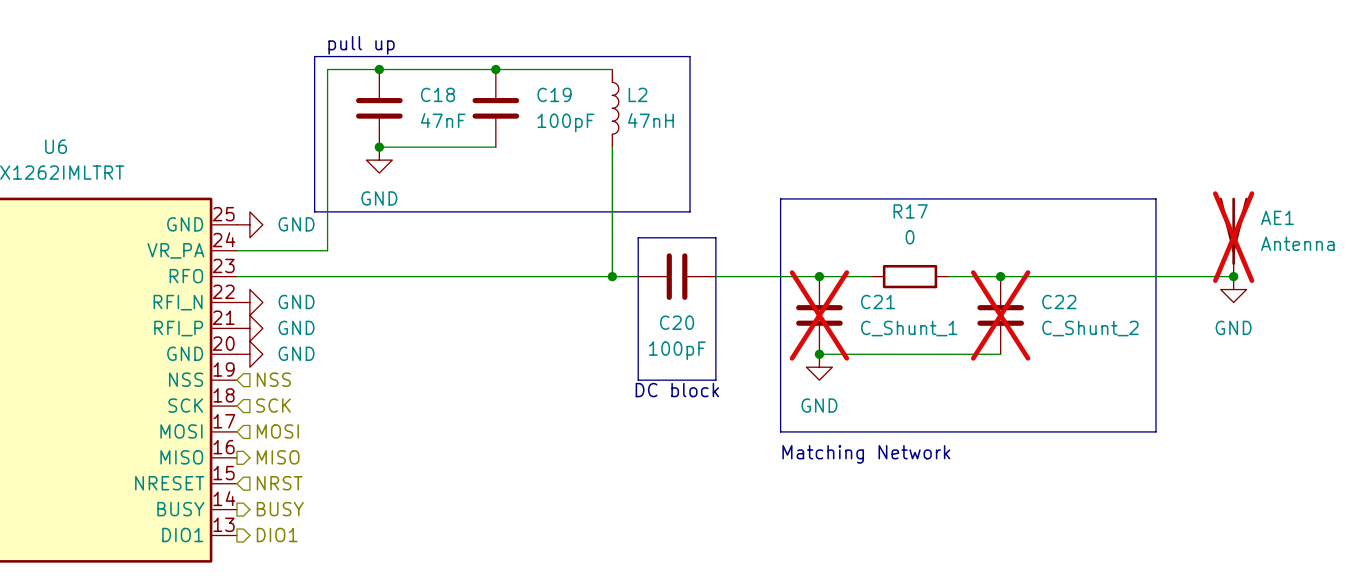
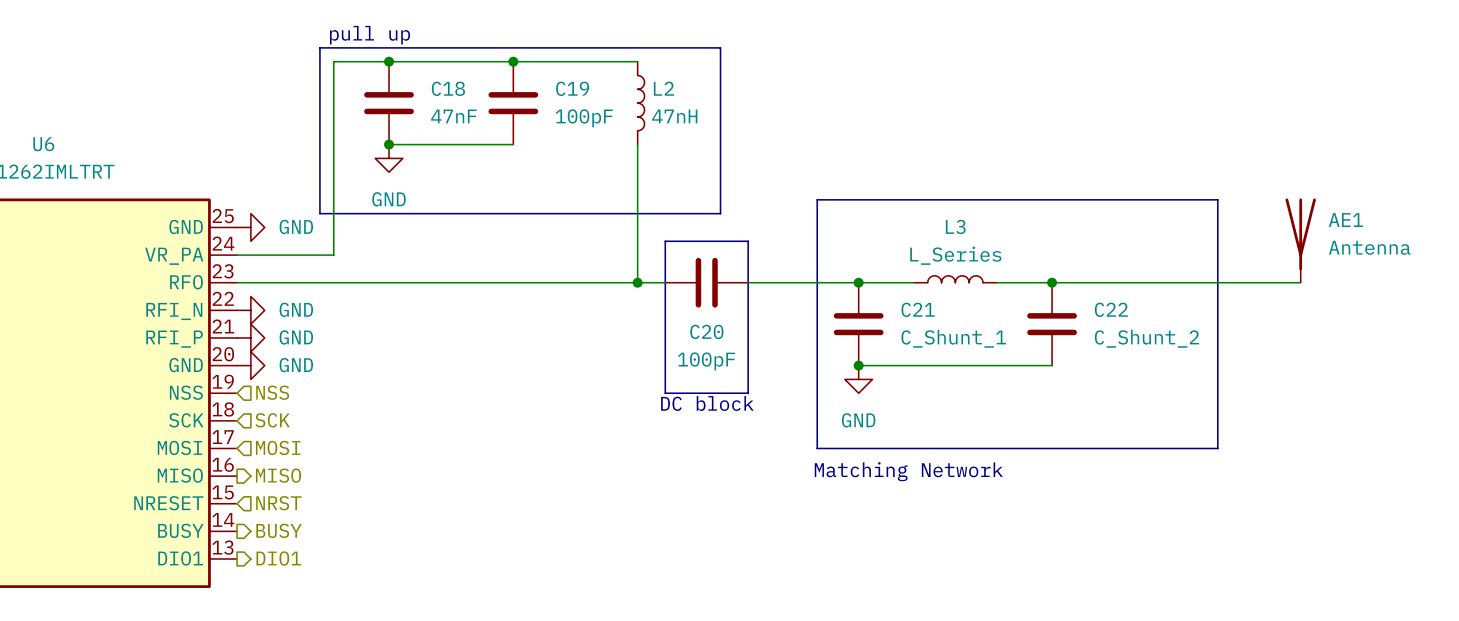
AE1 do-not-place cross: (1233, 237) -> none
L3: none -> L_Series (955, 279)
R17: 0 (910, 276) -> none
junction: (1233, 276) -> none
power symbol: GND (1233, 289) -> none
C21 do-not-place cross: (819, 315) -> none
C22 do-not-place cross: (1000, 315) -> none

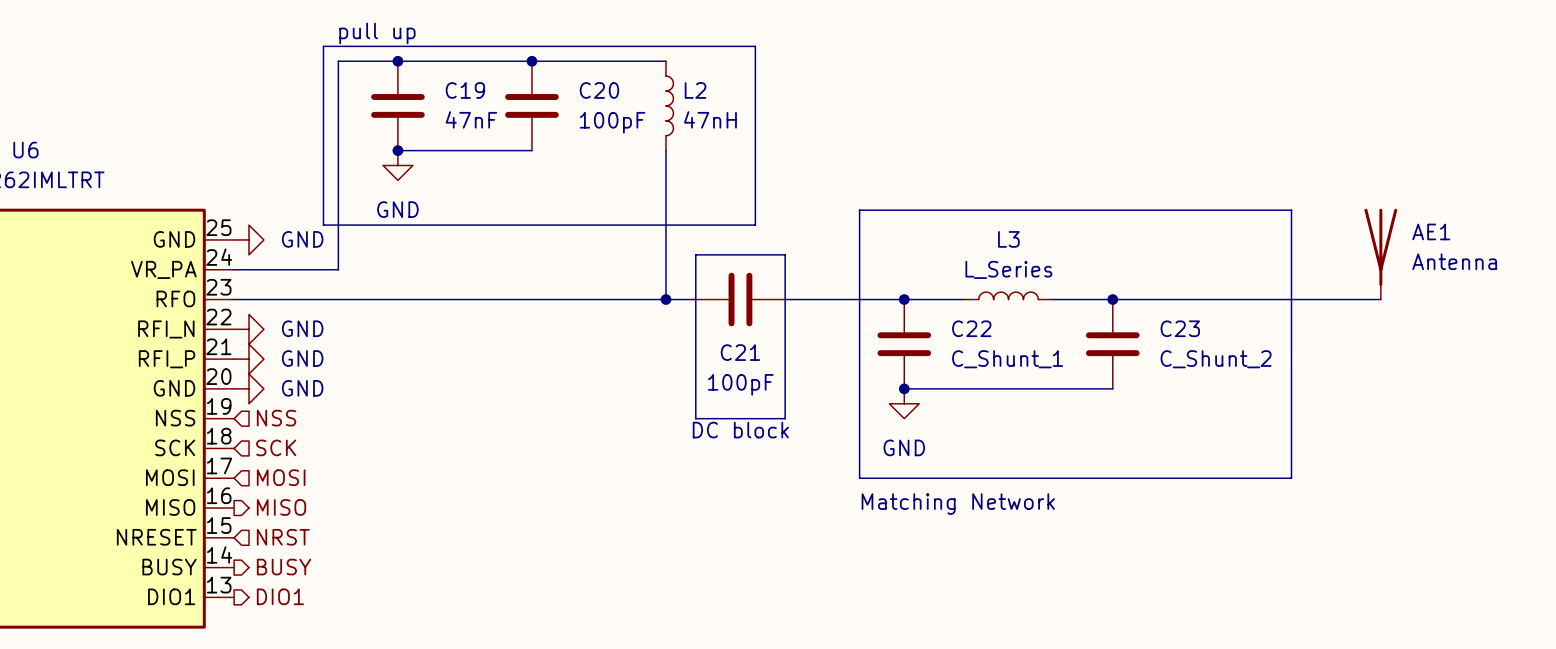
C18 name: C18 (448, 88) -> C19 (465, 90)
C19 name: C19 (572, 88) -> C20 (599, 90)
C21 name: C21 (918, 309) -> C22 (971, 328)
C22 name: C22 (1111, 309) -> C23 (1180, 328)
C20 name: C20 (706, 331) -> C21 (740, 352)

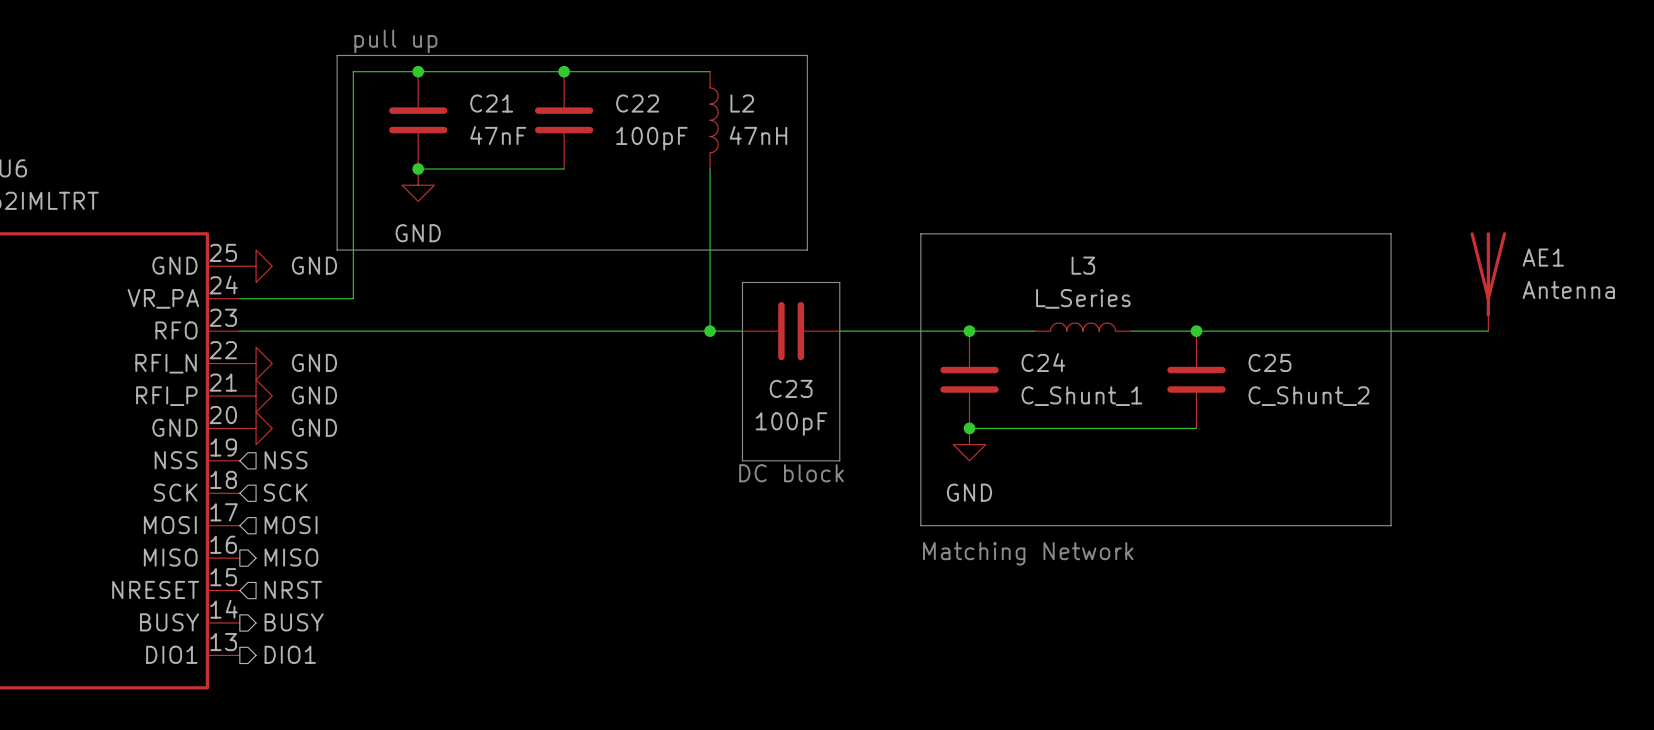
C19 name: C19 (465, 90) -> C21 (491, 103)
C20 name: C20 (599, 90) -> C22 (637, 103)
C22 name: C22 (971, 328) -> C24 (1043, 362)
C23 name: C23 (1180, 328) -> C25 (1269, 362)
C21 name: C21 (740, 352) -> C23 (791, 388)

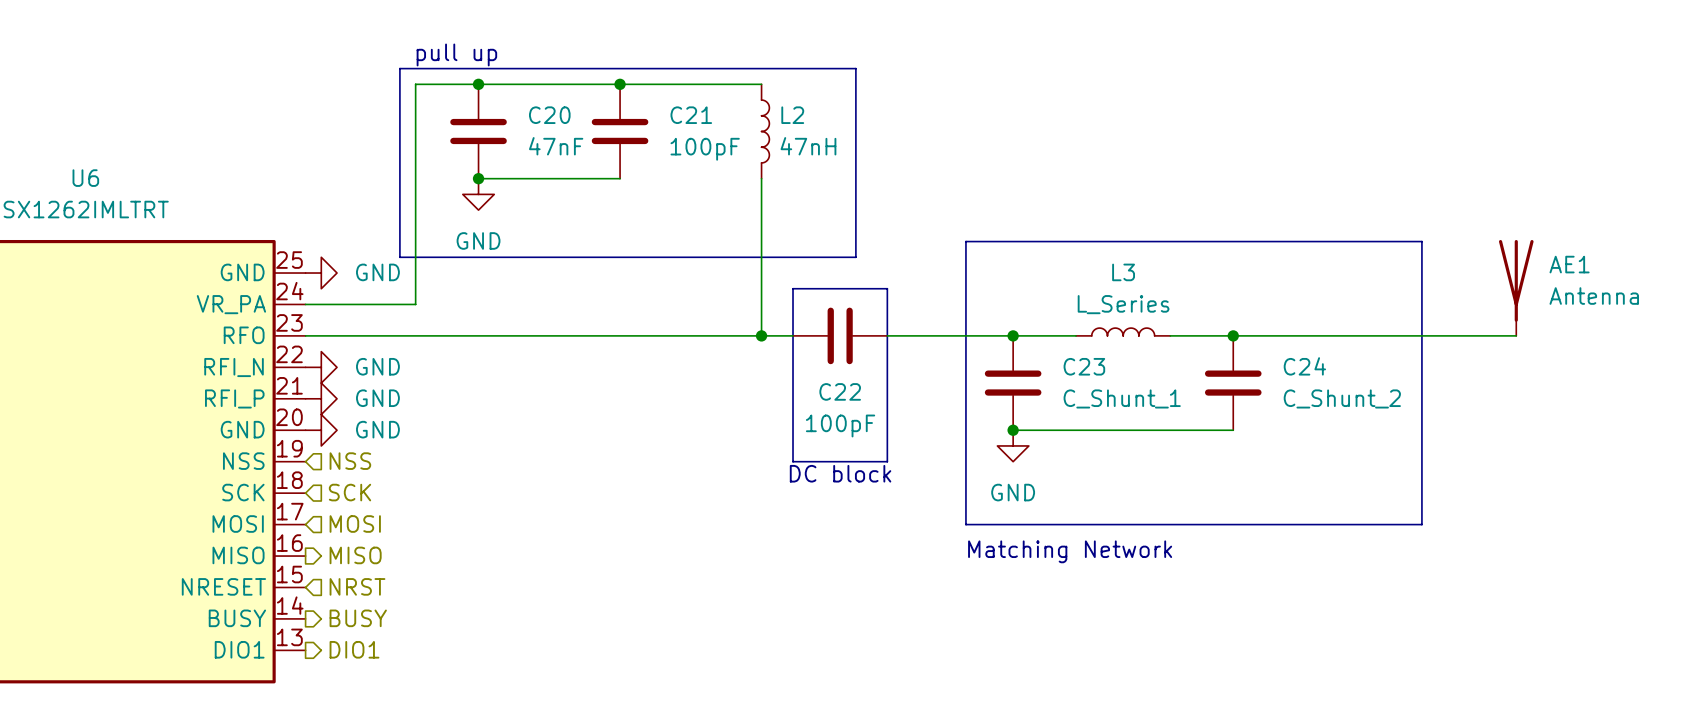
C21 name: C21 (491, 103) -> C20 (549, 115)
C22 name: C22 (637, 103) -> C21 (691, 115)
C24 name: C24 (1043, 362) -> C23 (1084, 366)
C25 name: C25 (1269, 362) -> C24 (1304, 366)
C23 name: C23 (791, 388) -> C22 (840, 391)

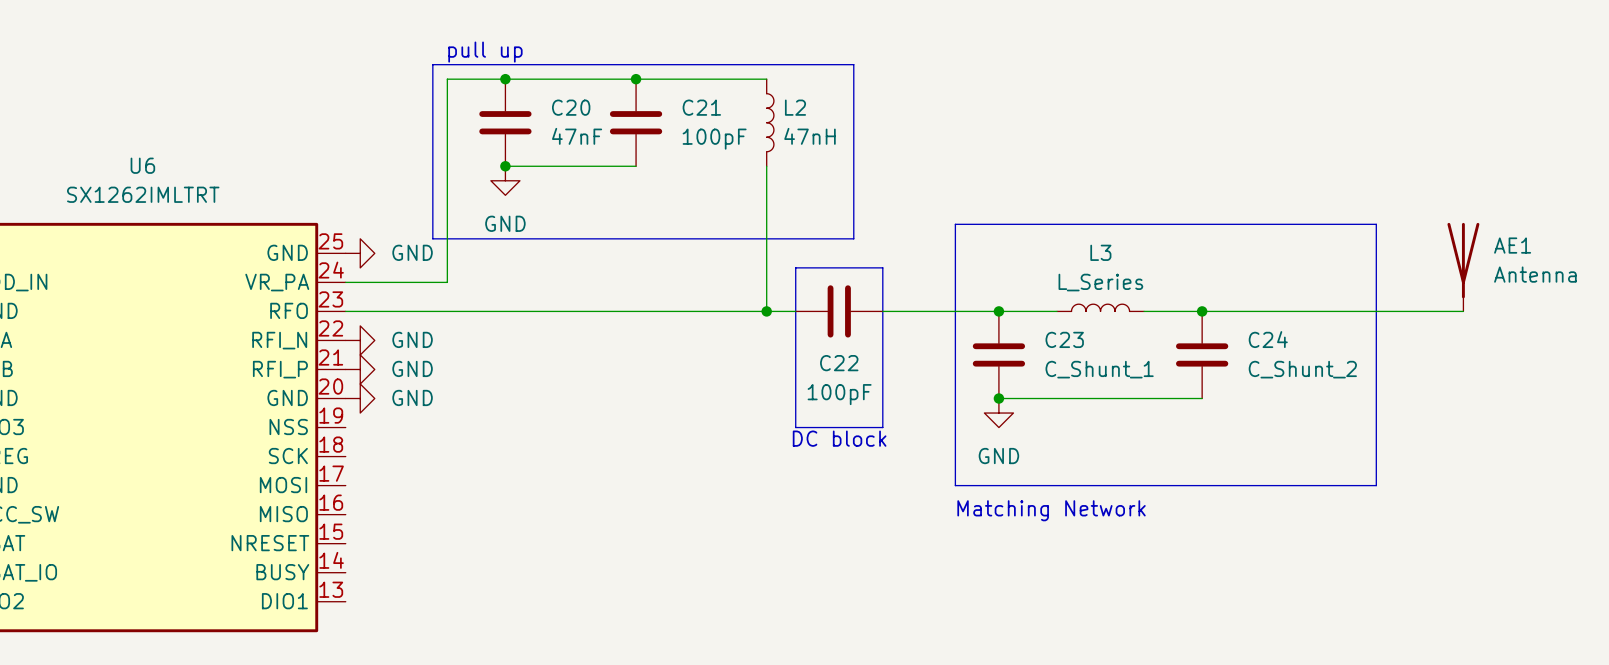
hierarchical label: NSS (350, 461) -> none
hierarchical label: SCK (350, 492) -> none
hierarchical label: MOSI (355, 524) -> none
hierarchical label: MISO (355, 555) -> none
hierarchical label: NRST (357, 586) -> none
hierarchical label: BUSY (358, 618) -> none
hierarchical label: DIO1 (354, 649) -> none

